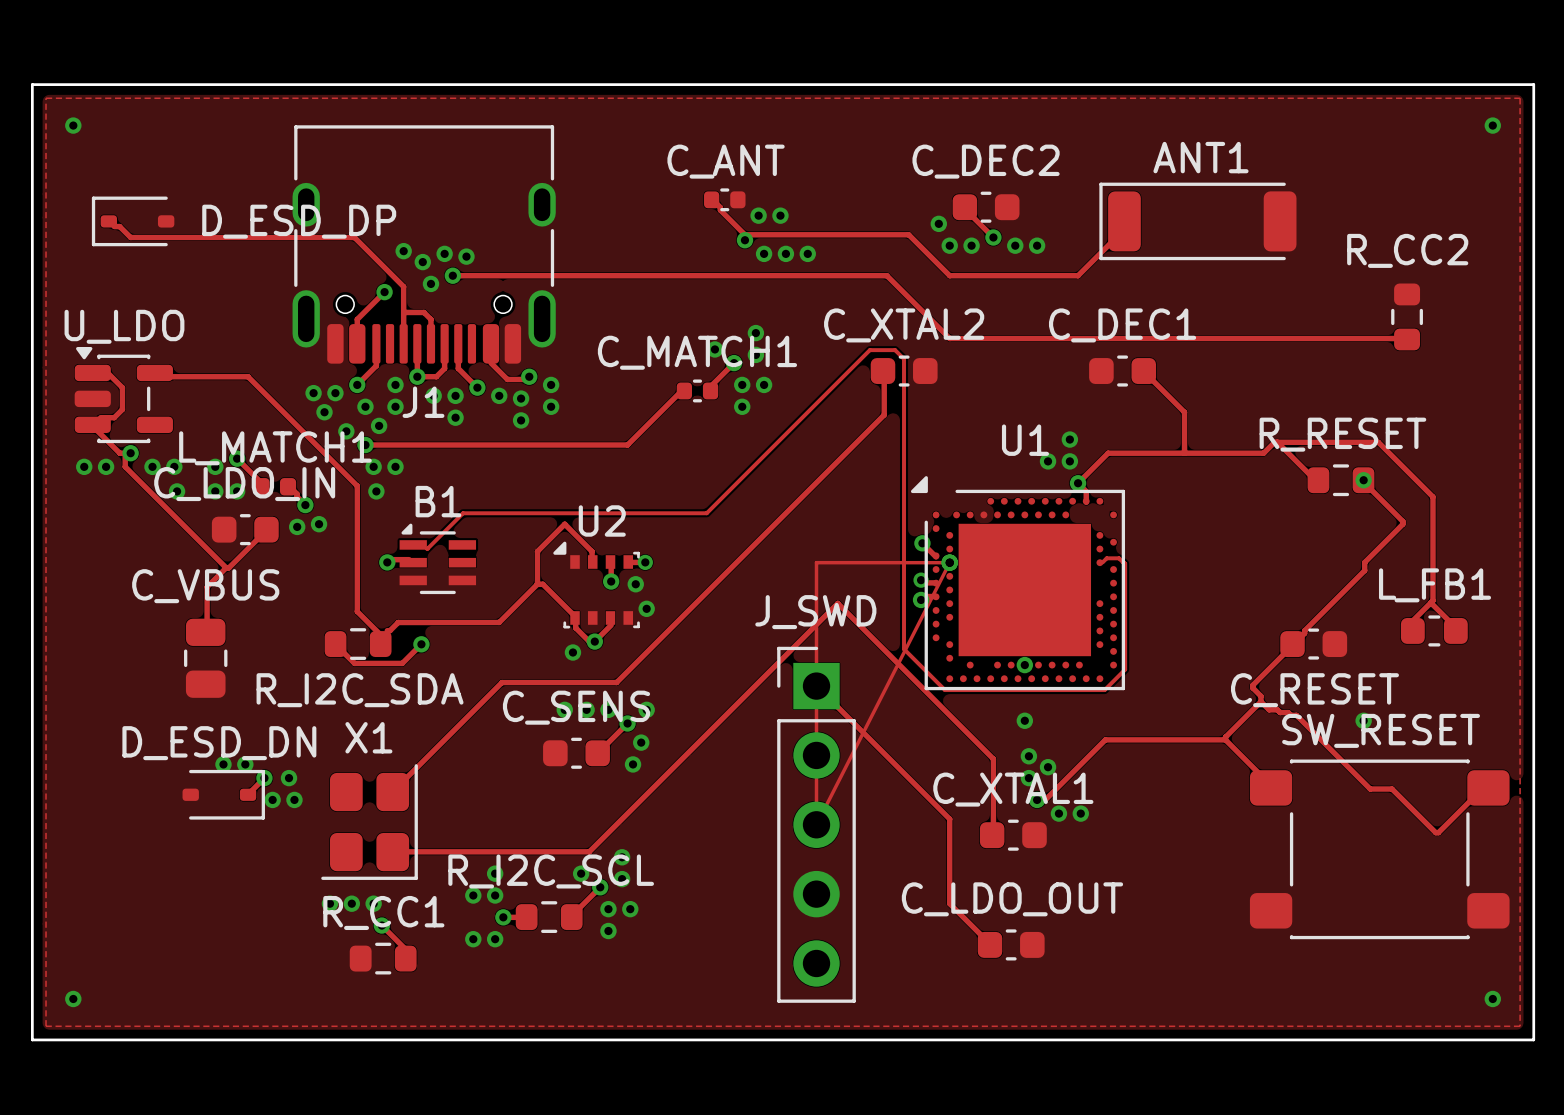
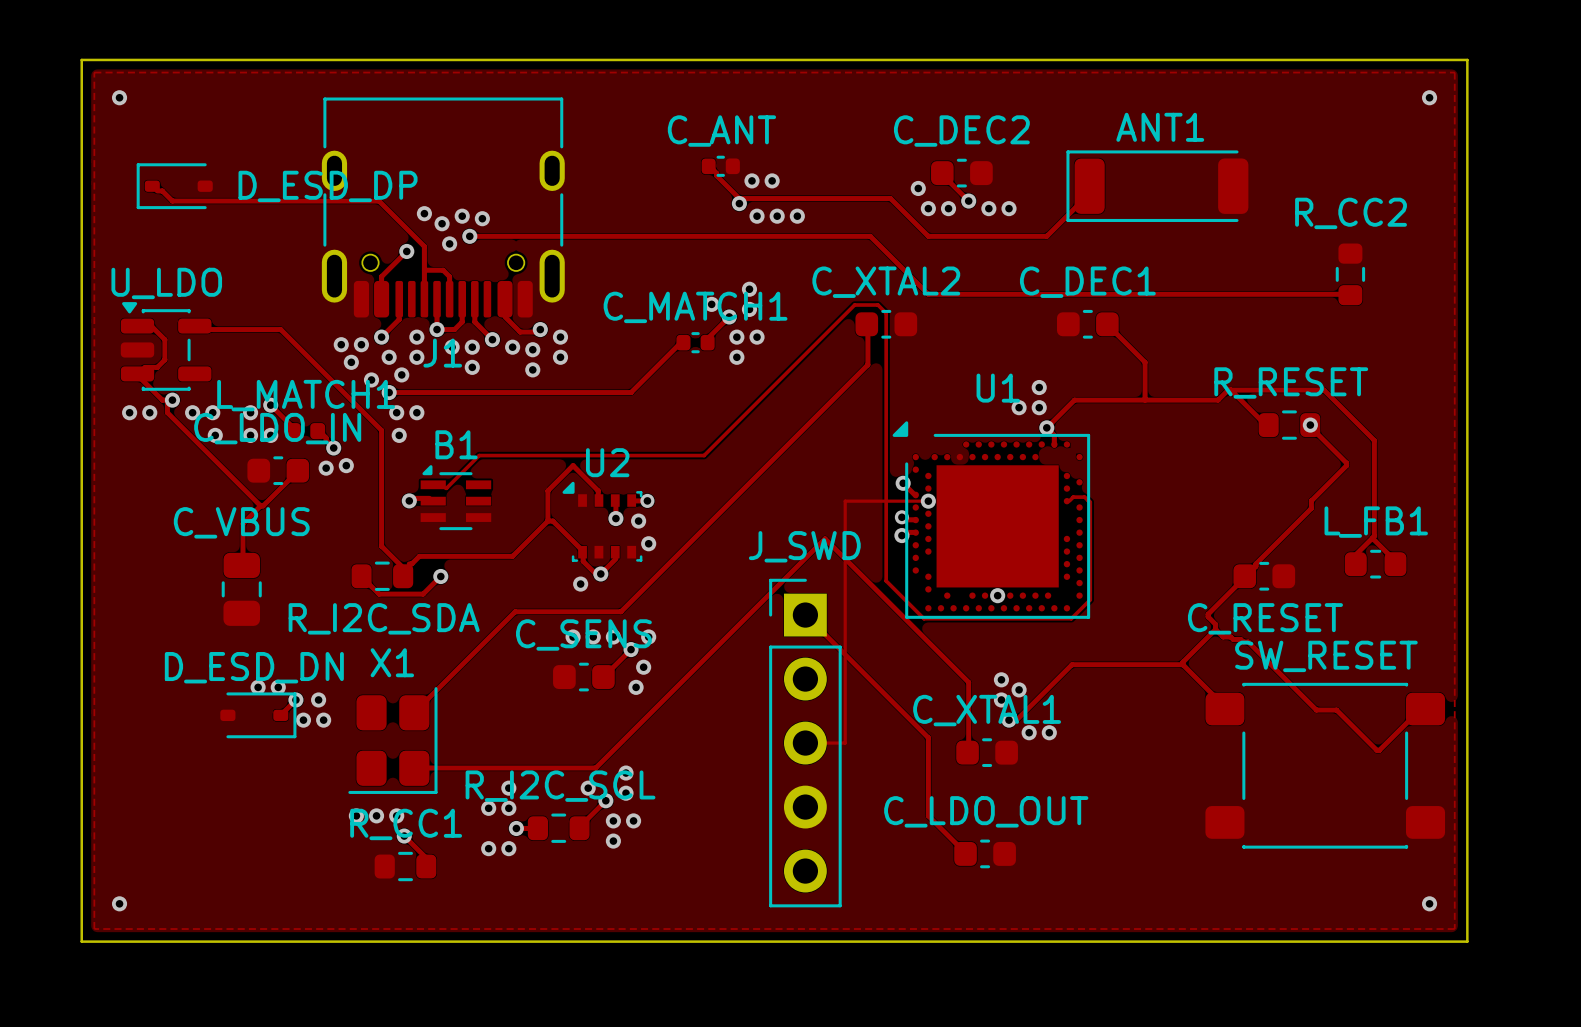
track: (859, 562) (816, 562) (816, 824) (949, 562) -> (845, 501) (845, 743) (805, 743)
via: (1024, 720) -> none
via: (1363, 720) -> none

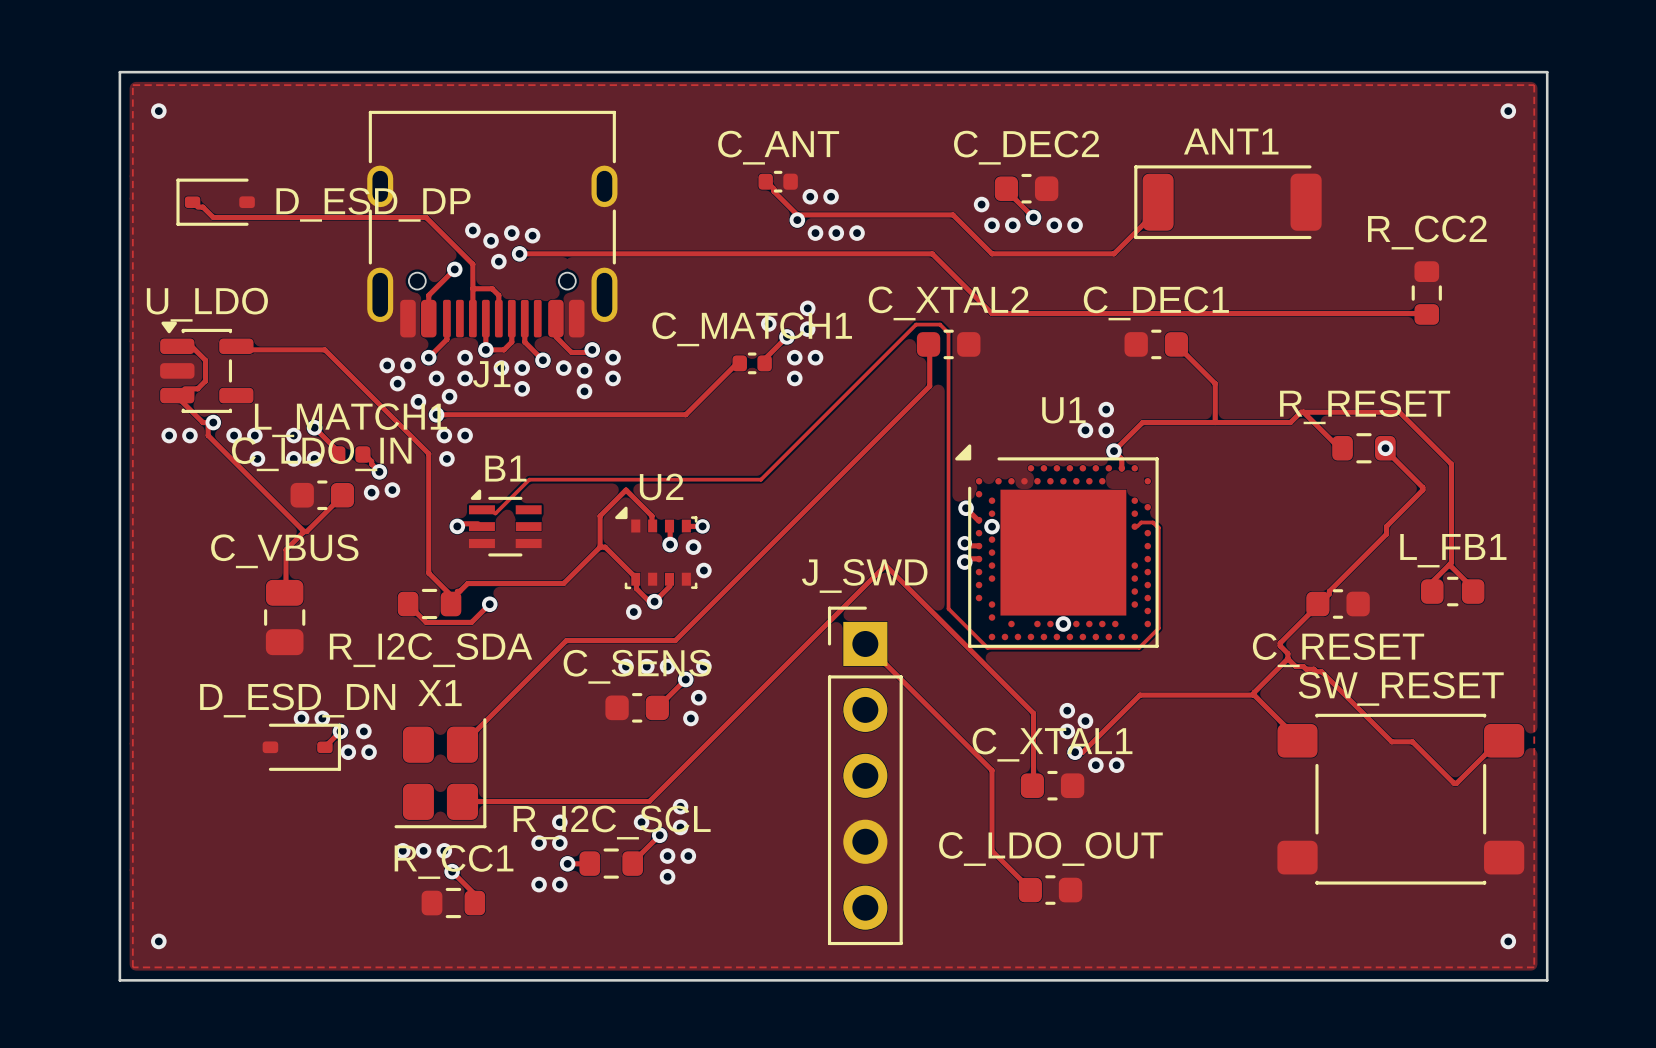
track: (928, 501) (845, 501) (845, 743) (805, 743) -> none

